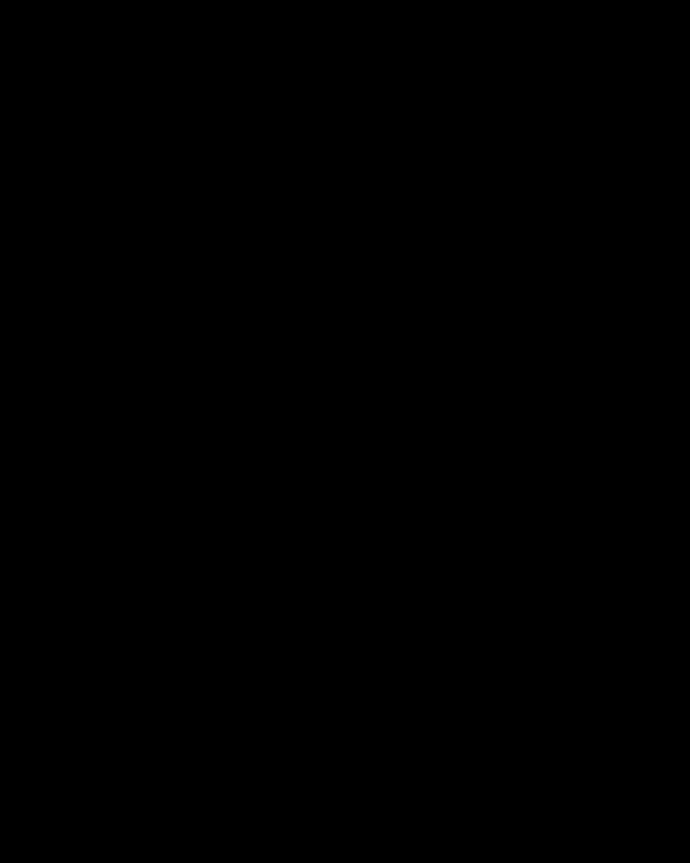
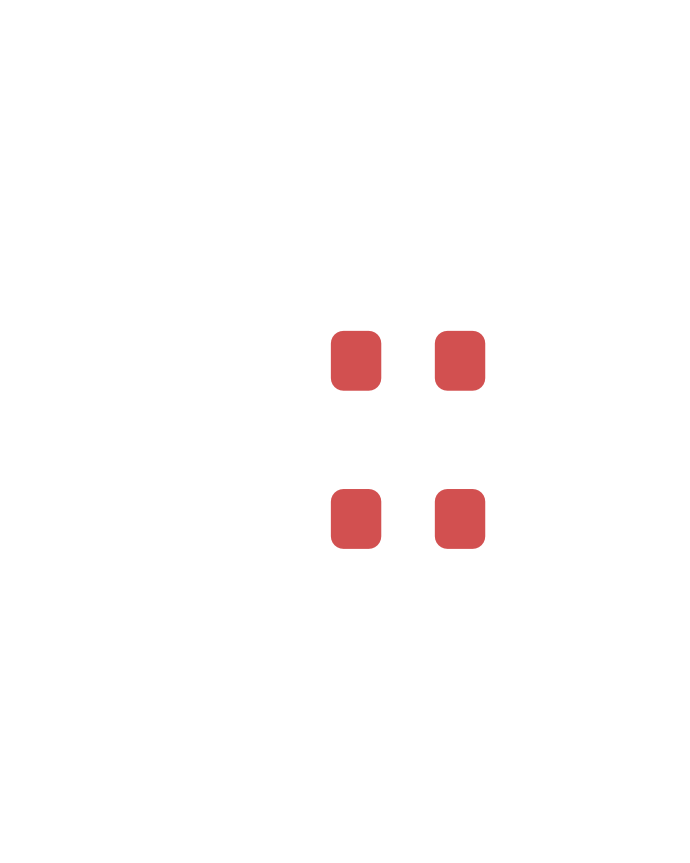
part: none -> (408, 360)
part: none -> (408, 518)

